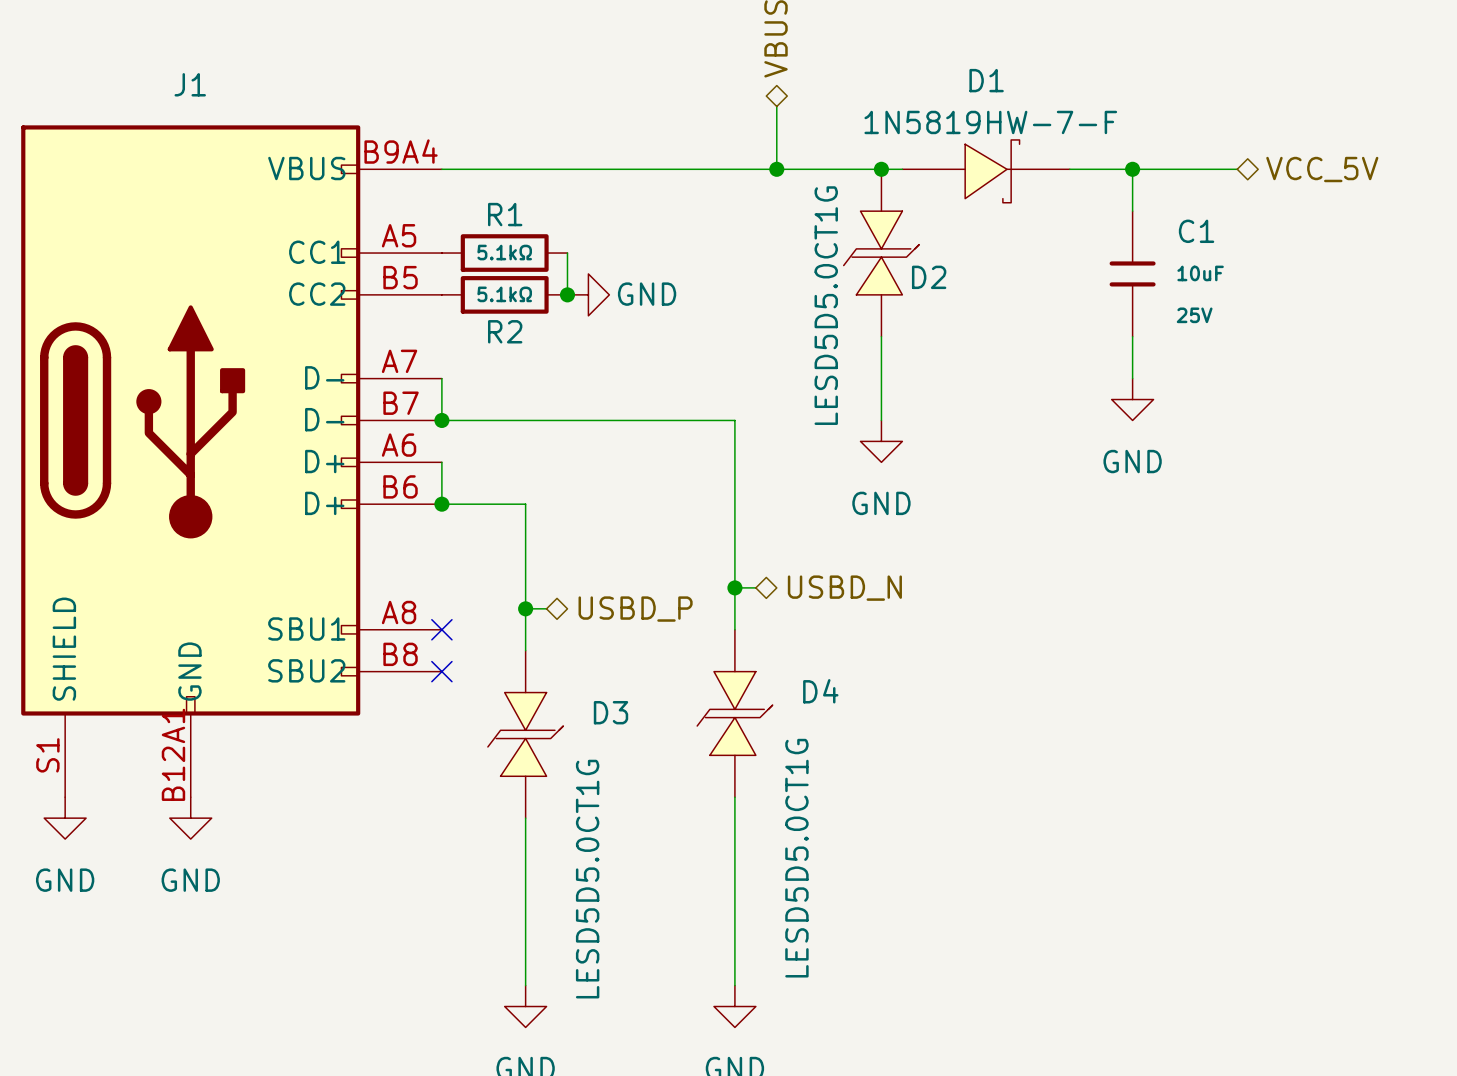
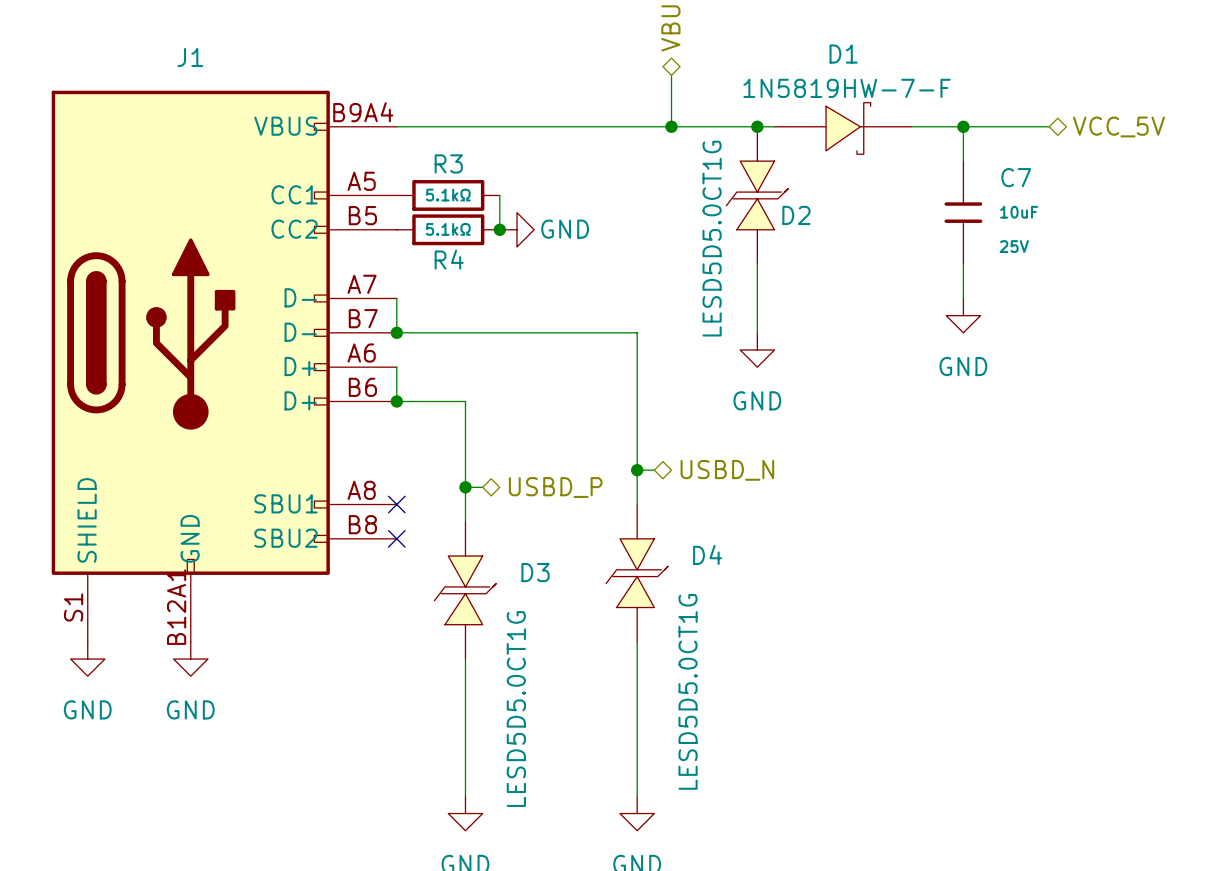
R1 name: R1 (505, 214) -> R3 (448, 163)
C1 name: C1 (1196, 231) -> C7 (1016, 177)
R2 name: R2 (505, 331) -> R4 (449, 259)

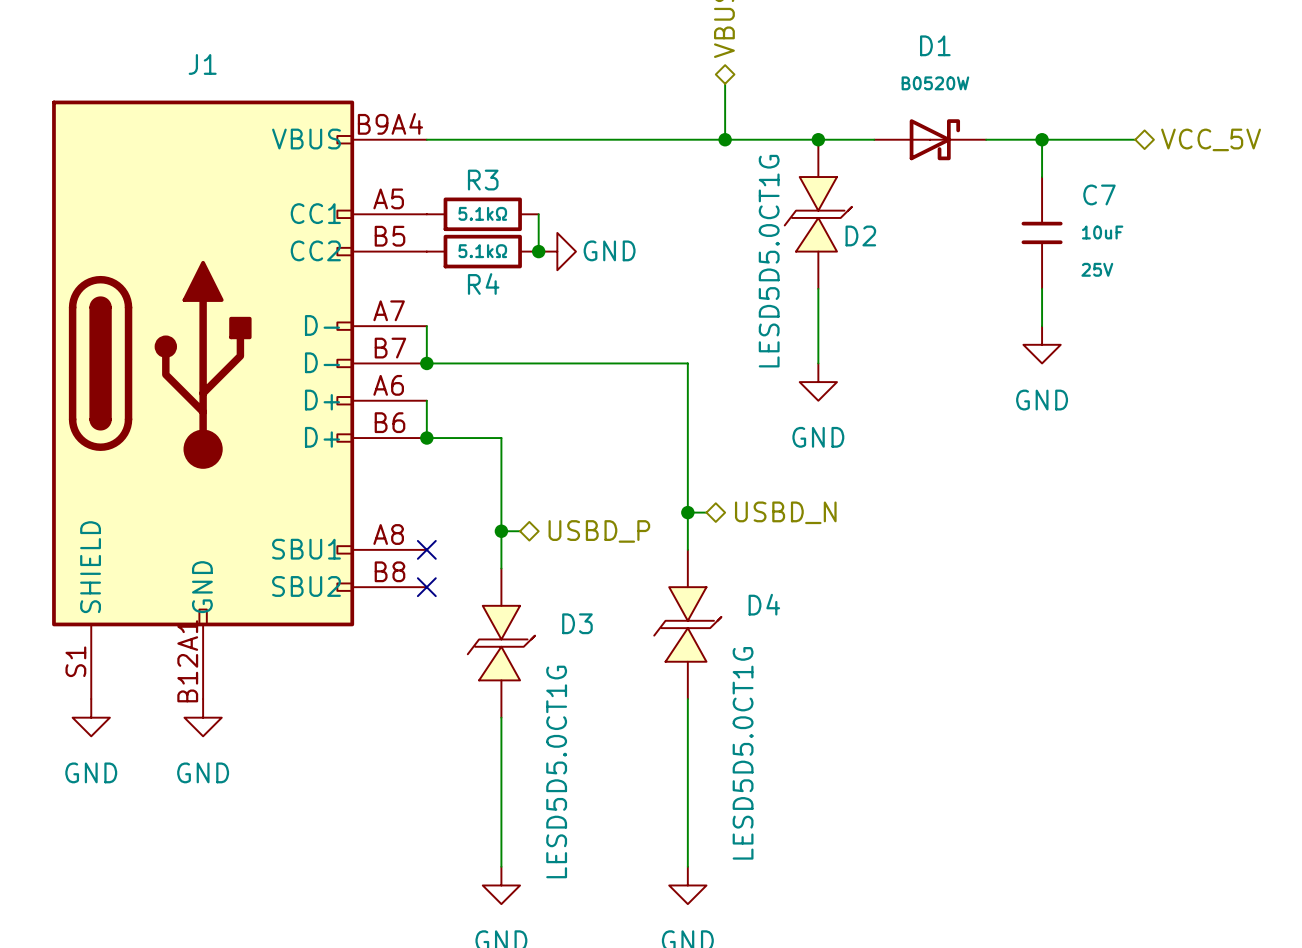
D1 value: 1N5819HW-7-F (847, 88) -> B0520W (935, 83)
D1 symbol: [774, 102, 912, 155] -> [874, 119, 987, 161]

